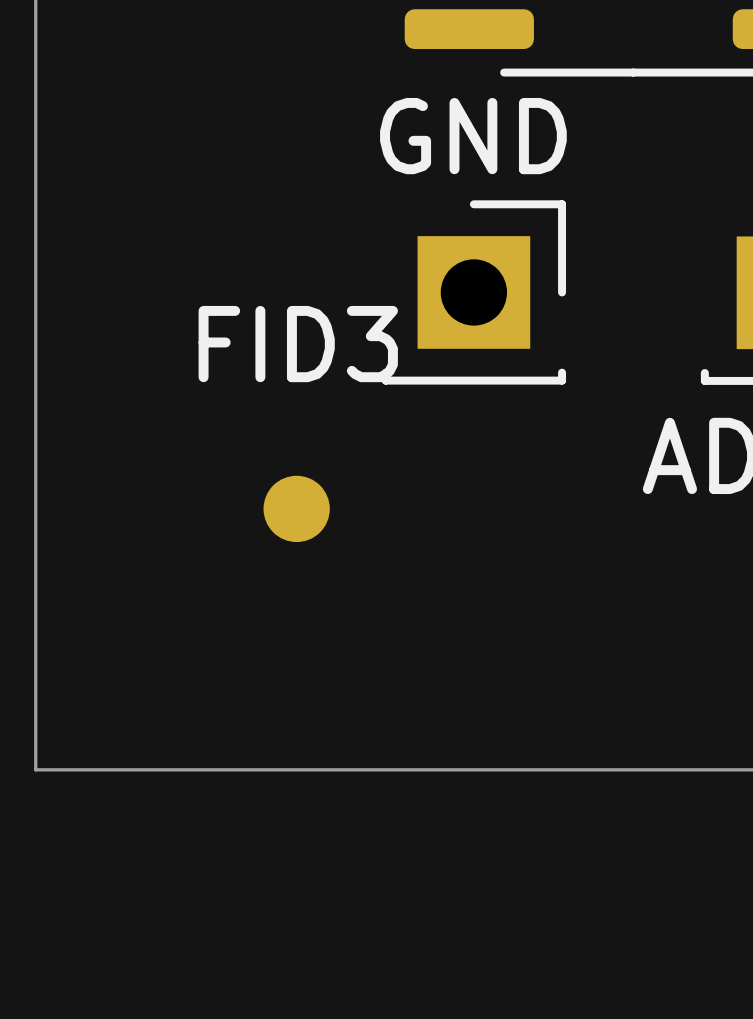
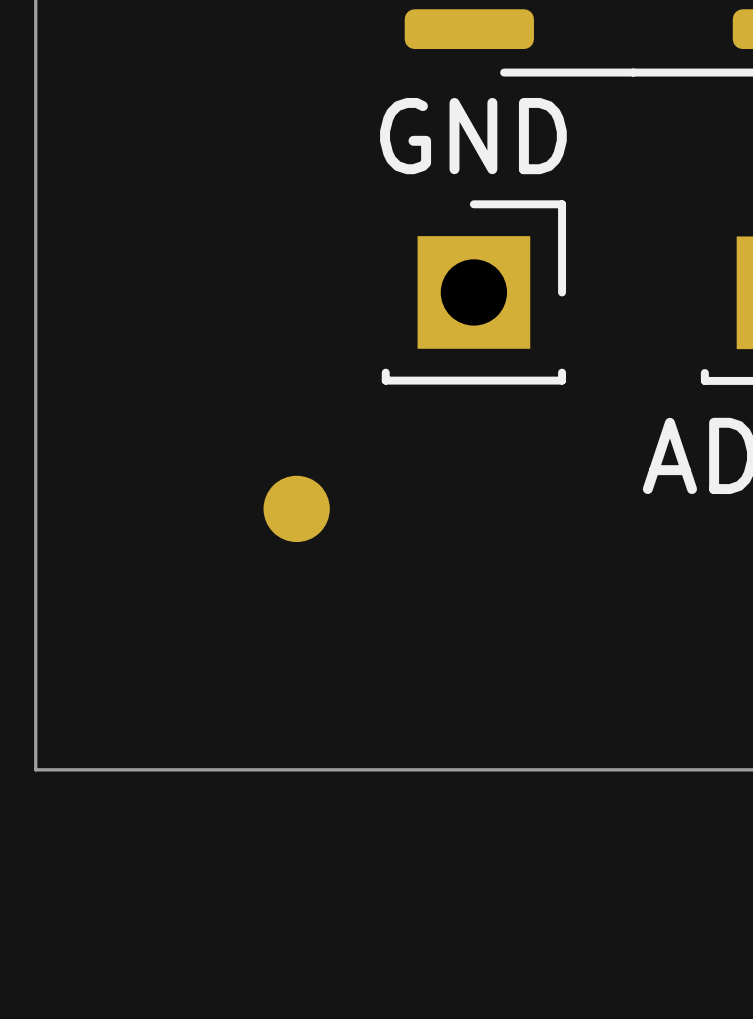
FID3 name: FID3 (298, 344) -> none

